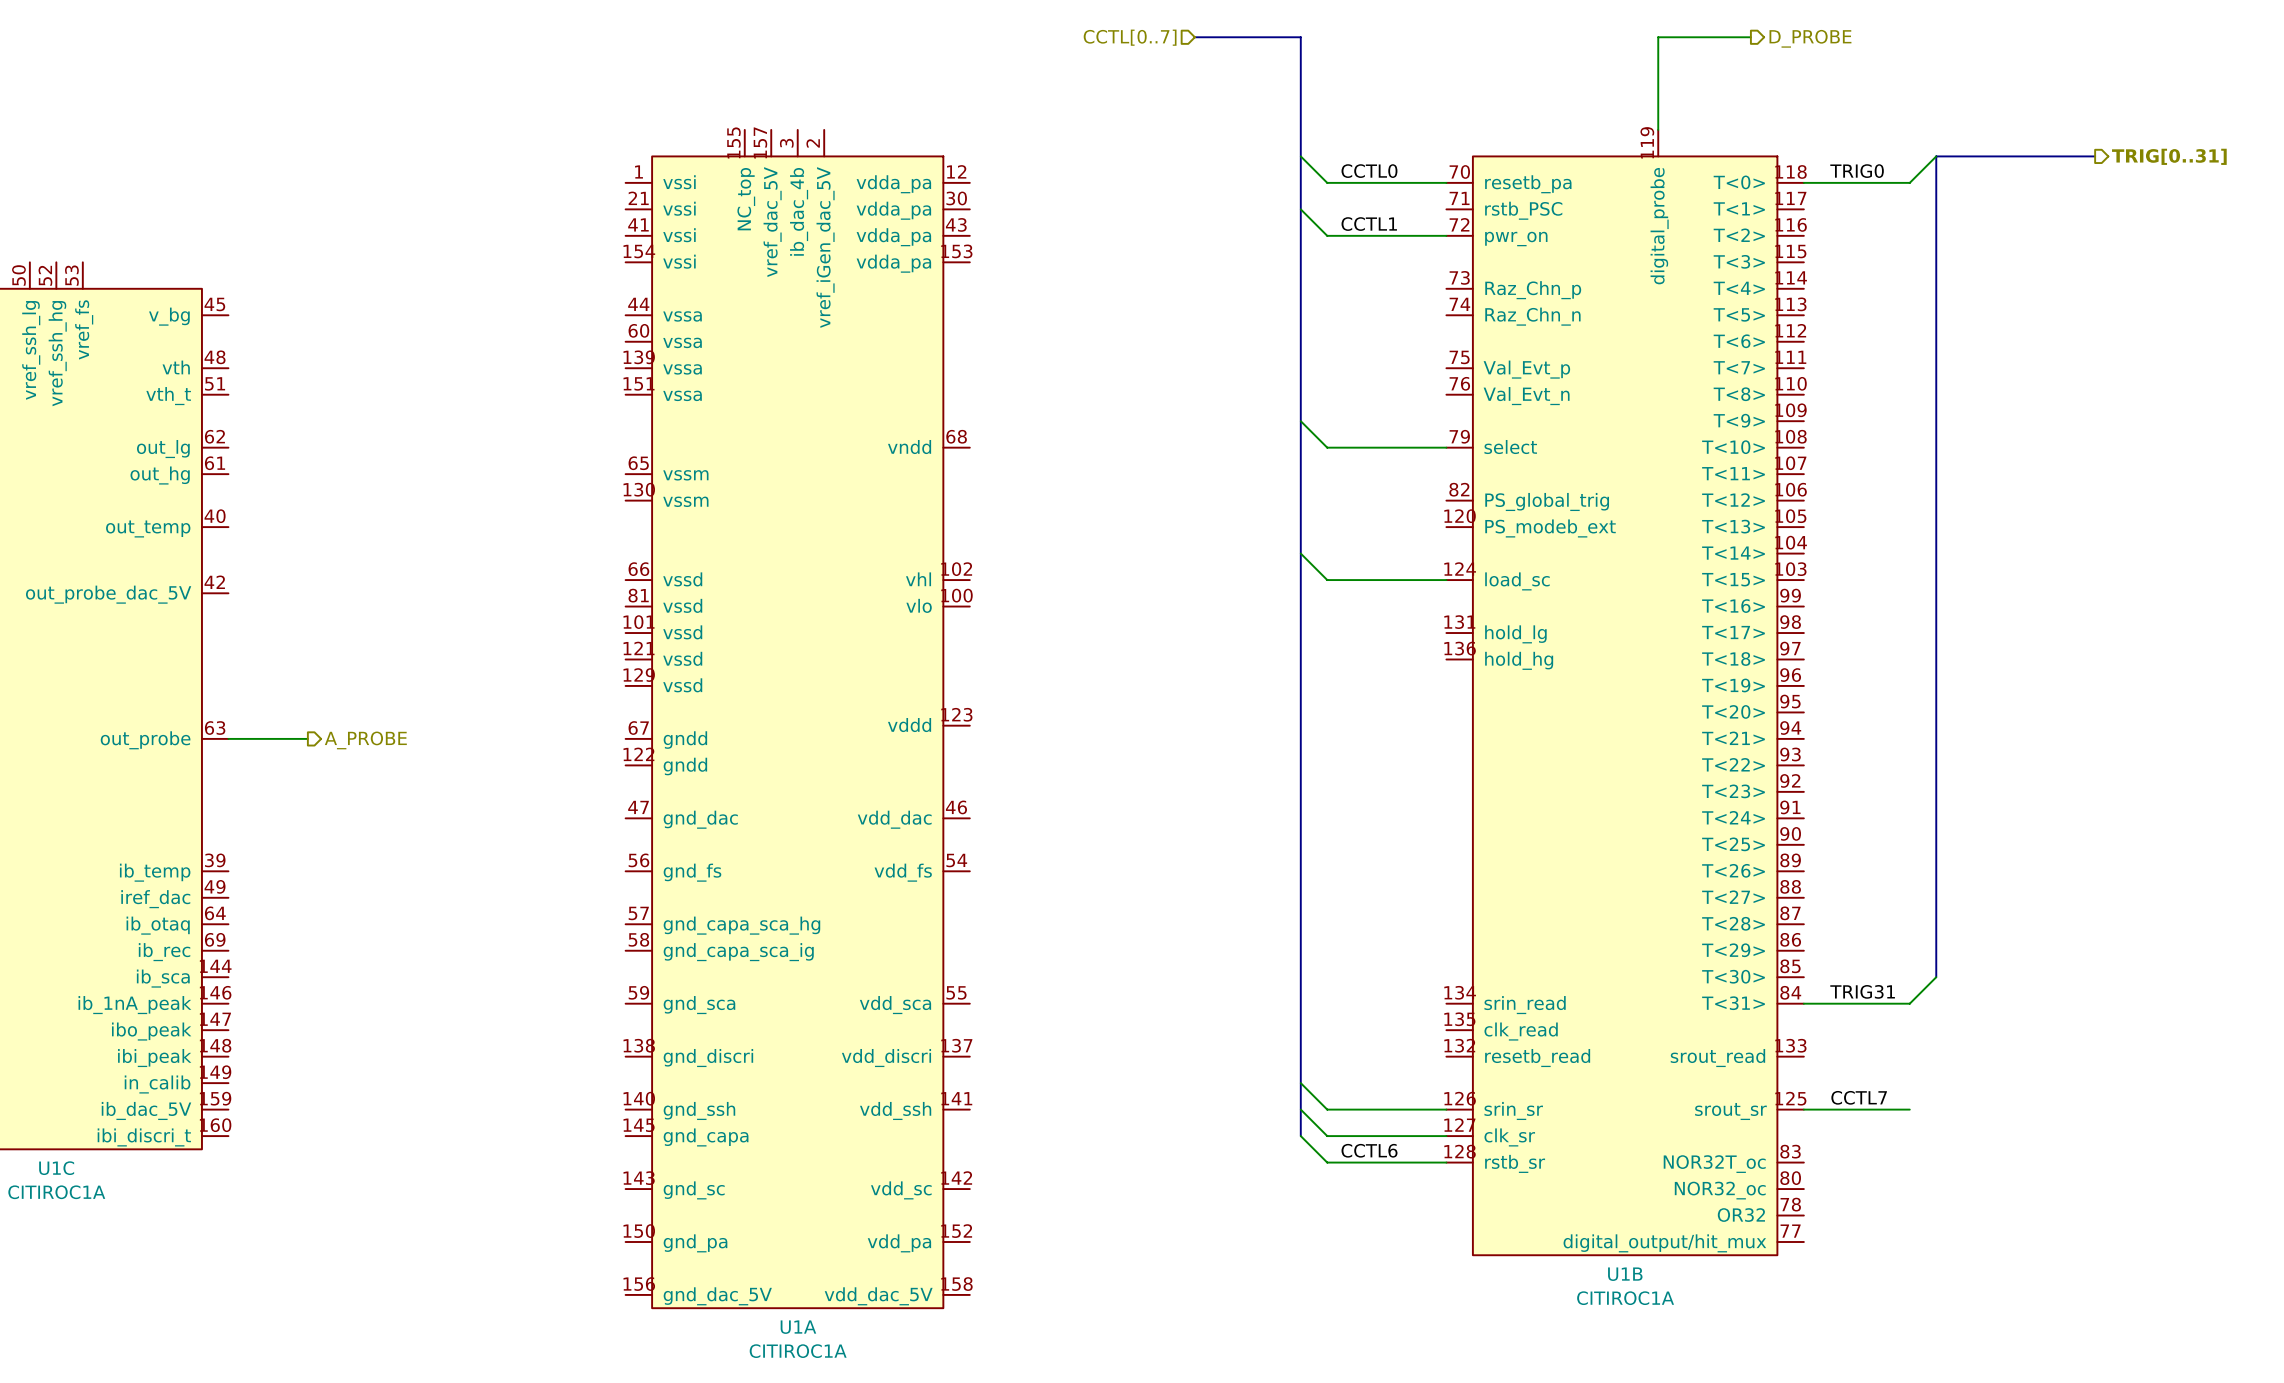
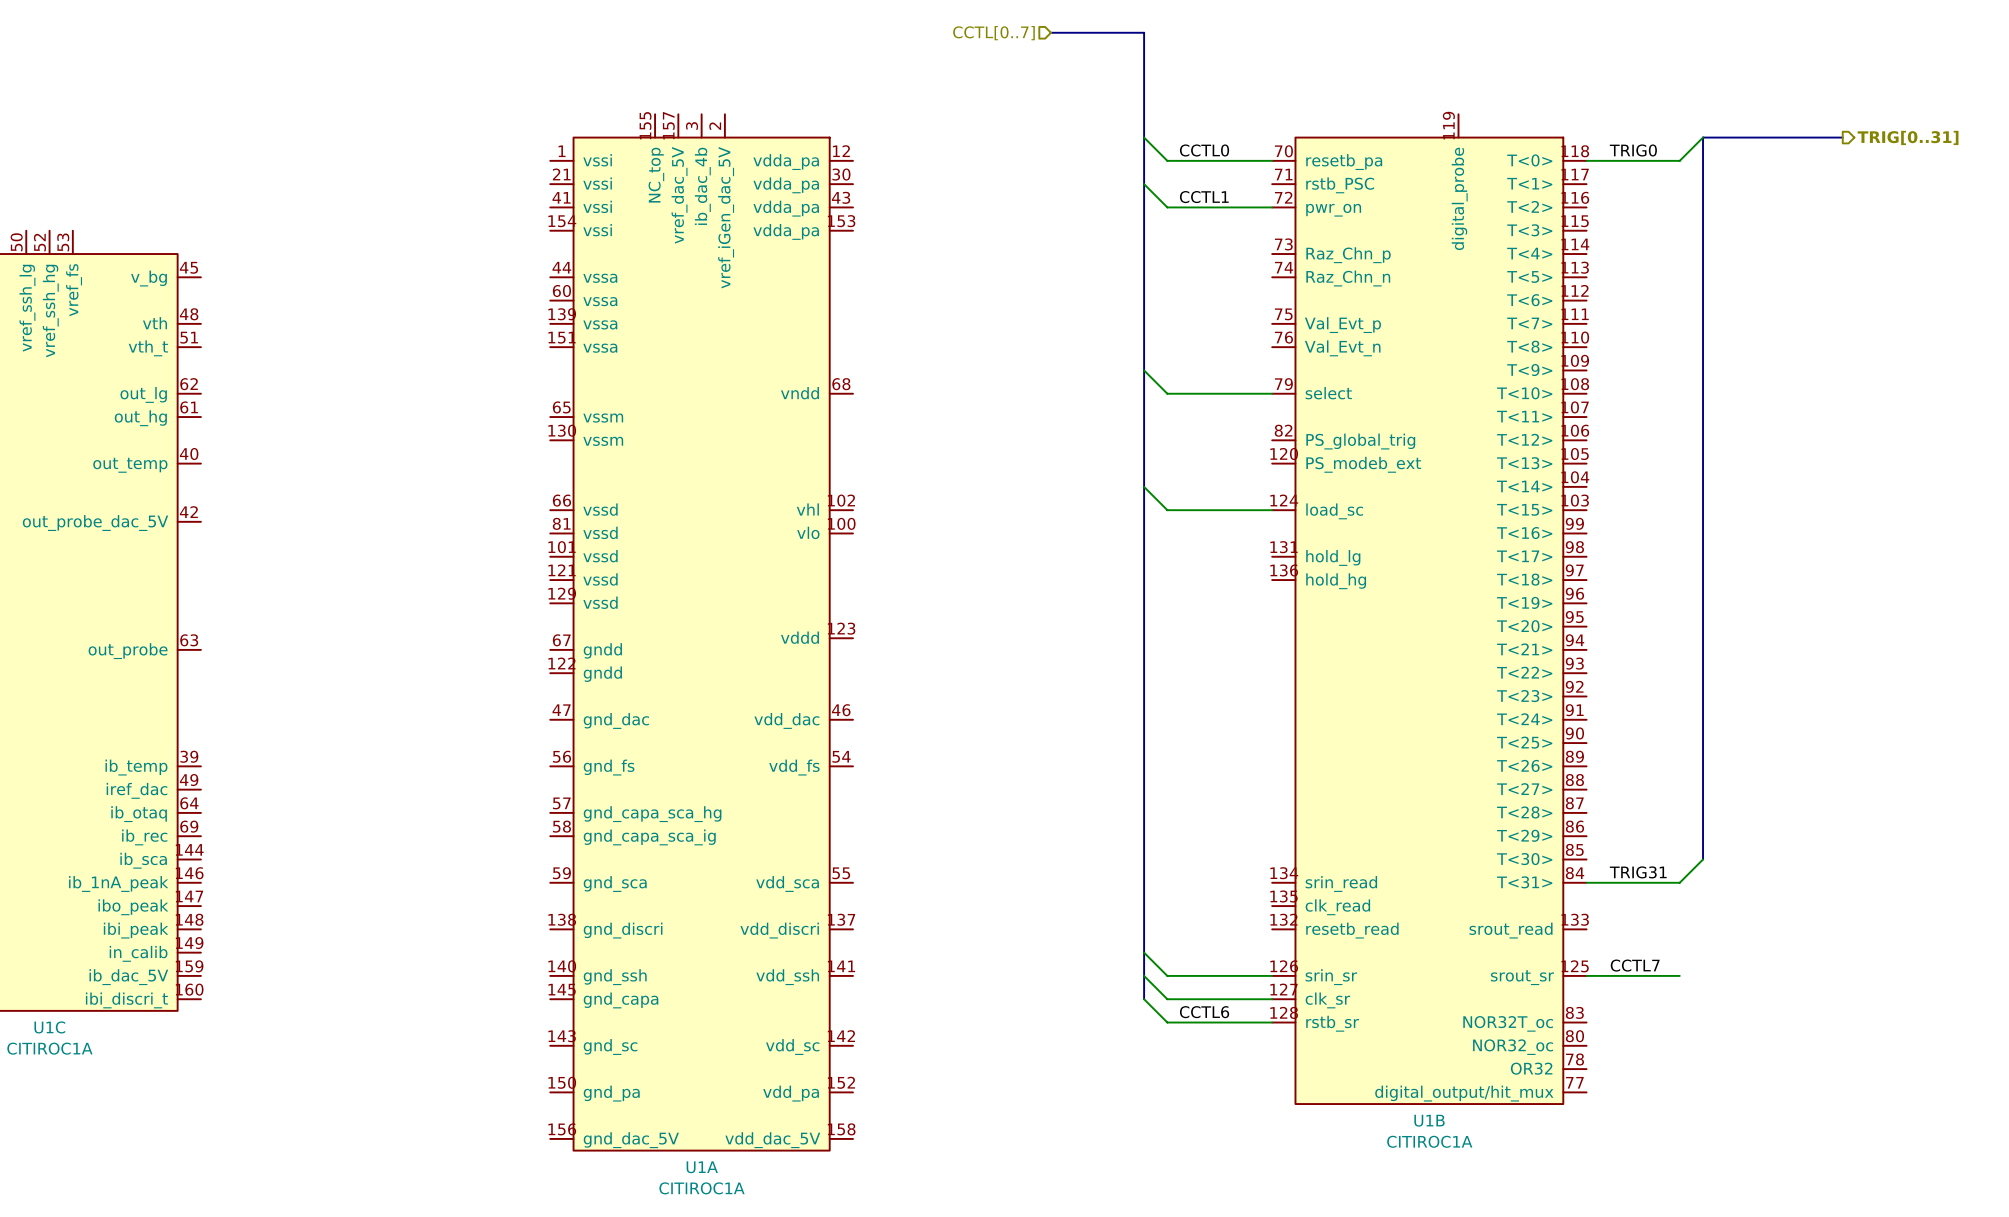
wire: (1750, 37) (1658, 37) (1658, 129) -> none
hierarchical label: D_PROBE (1810, 38) -> none
wire: (228, 738) (307, 738) -> none
hierarchical label: A_PROBE (365, 740) -> none

